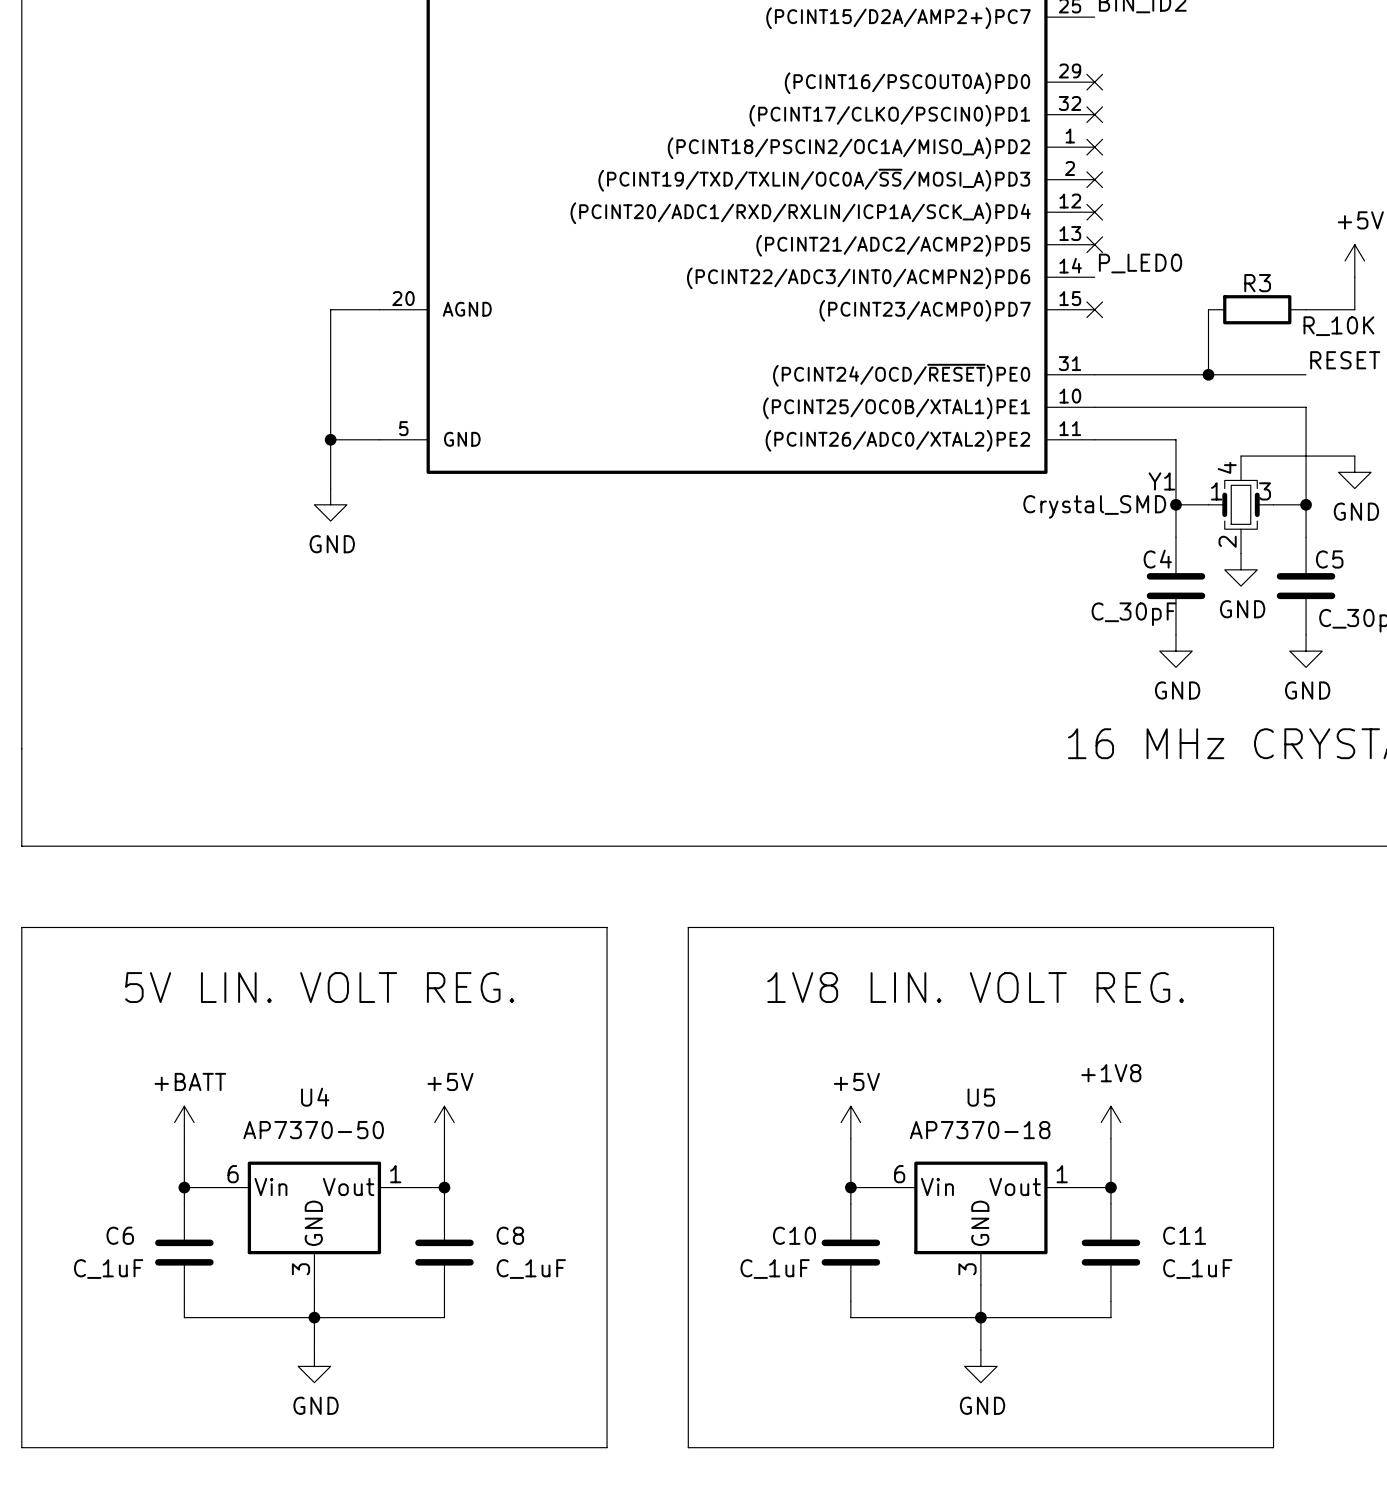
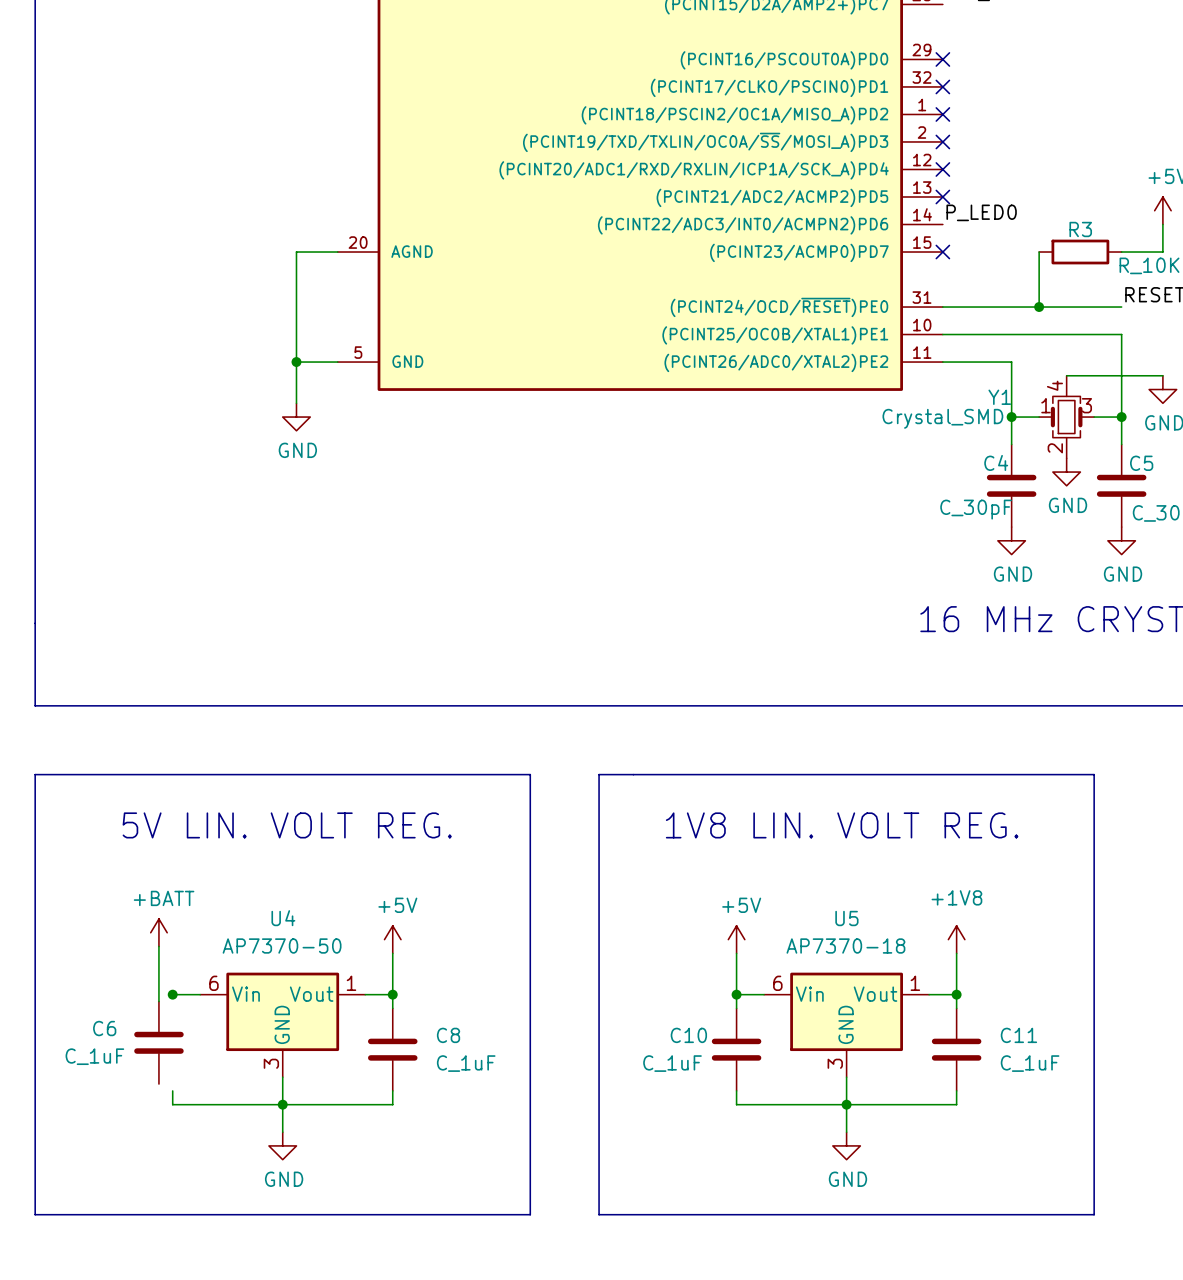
power symbol position: +BATT (184, 1122) -> +BATT (158, 932)
wire: (184, 1138) (184, 1203) -> (158, 946) (158, 1001)
C6 position: (184, 1252) -> (158, 1042)

